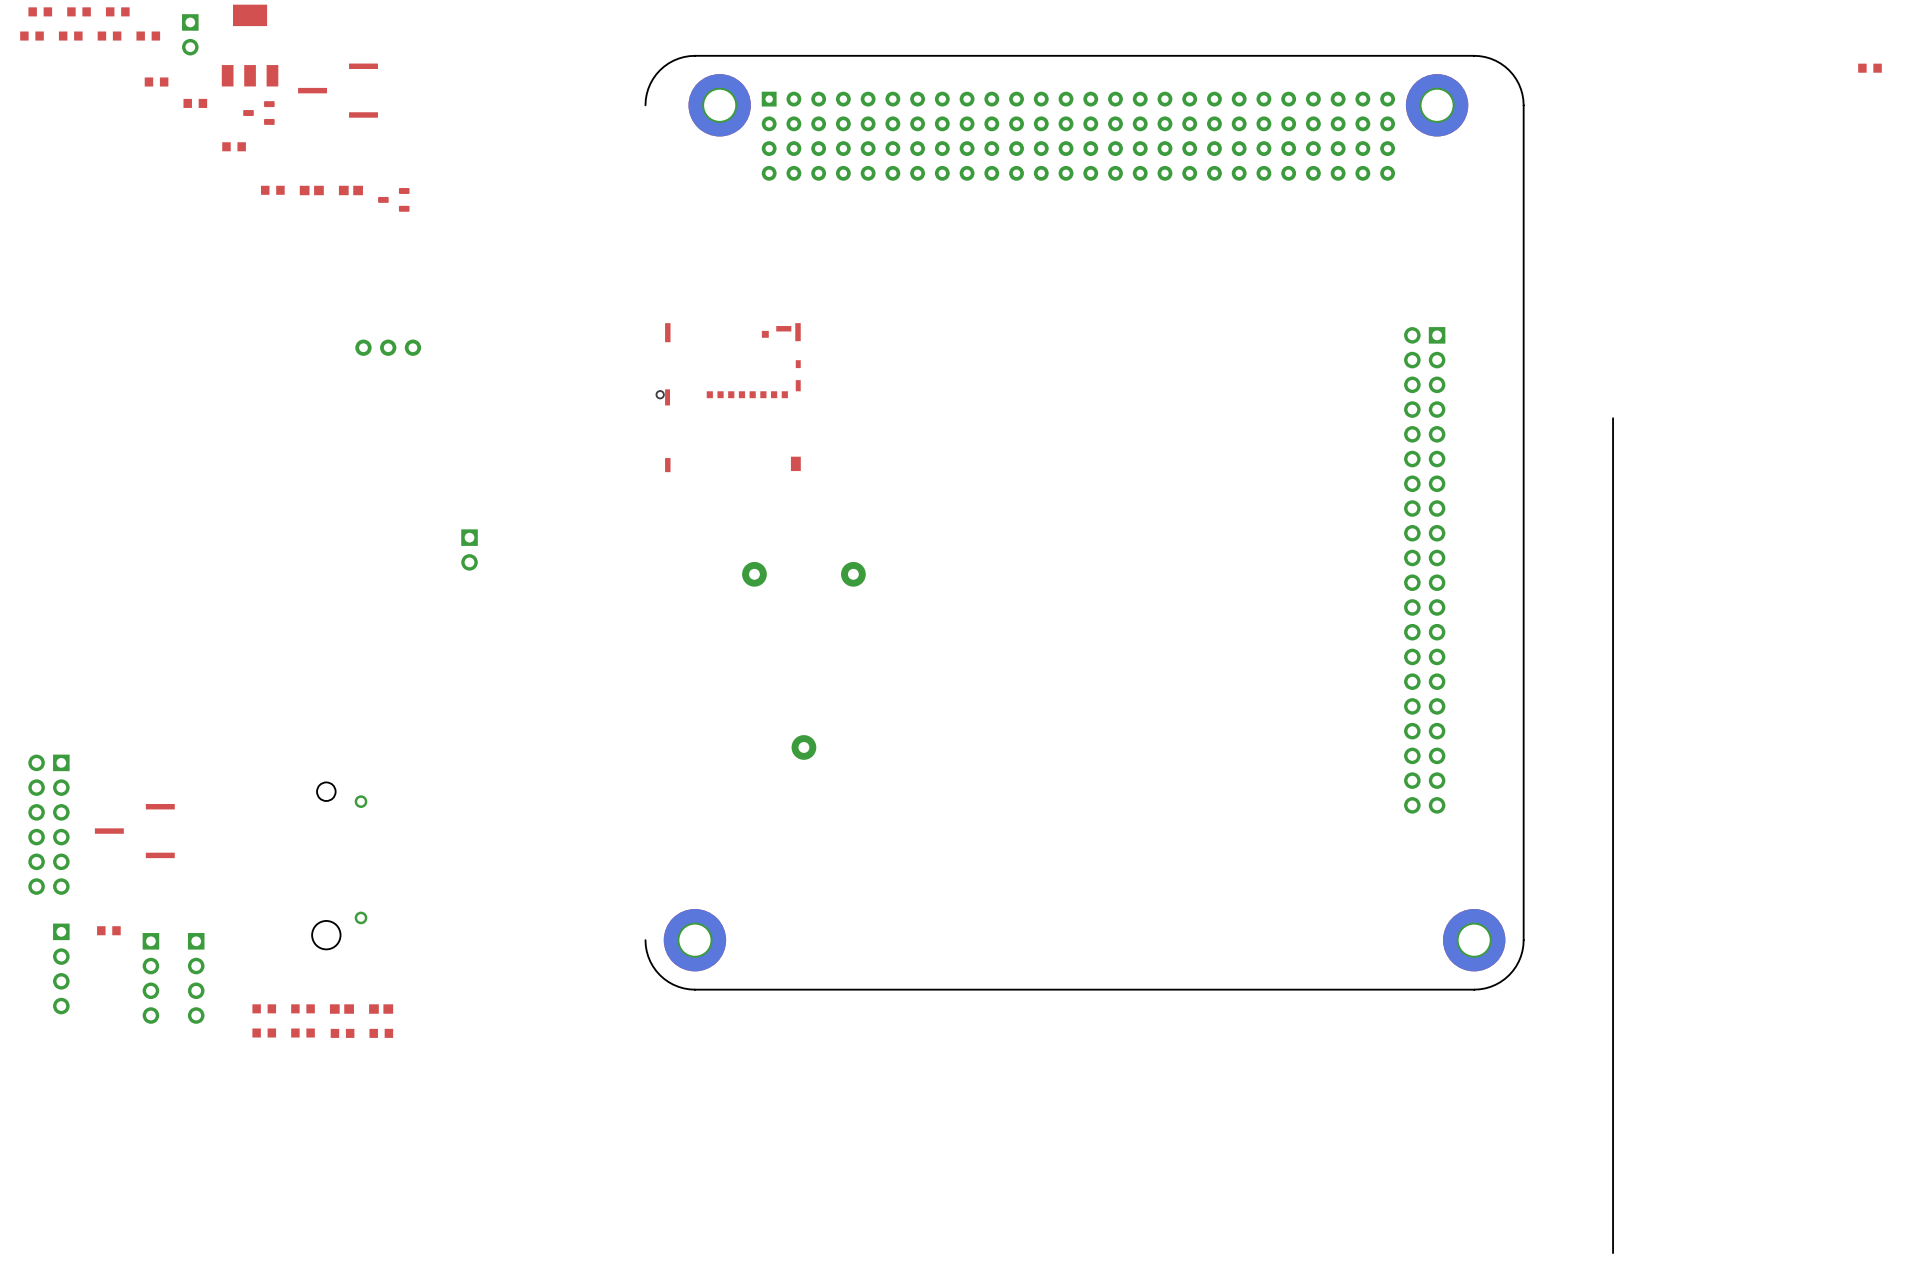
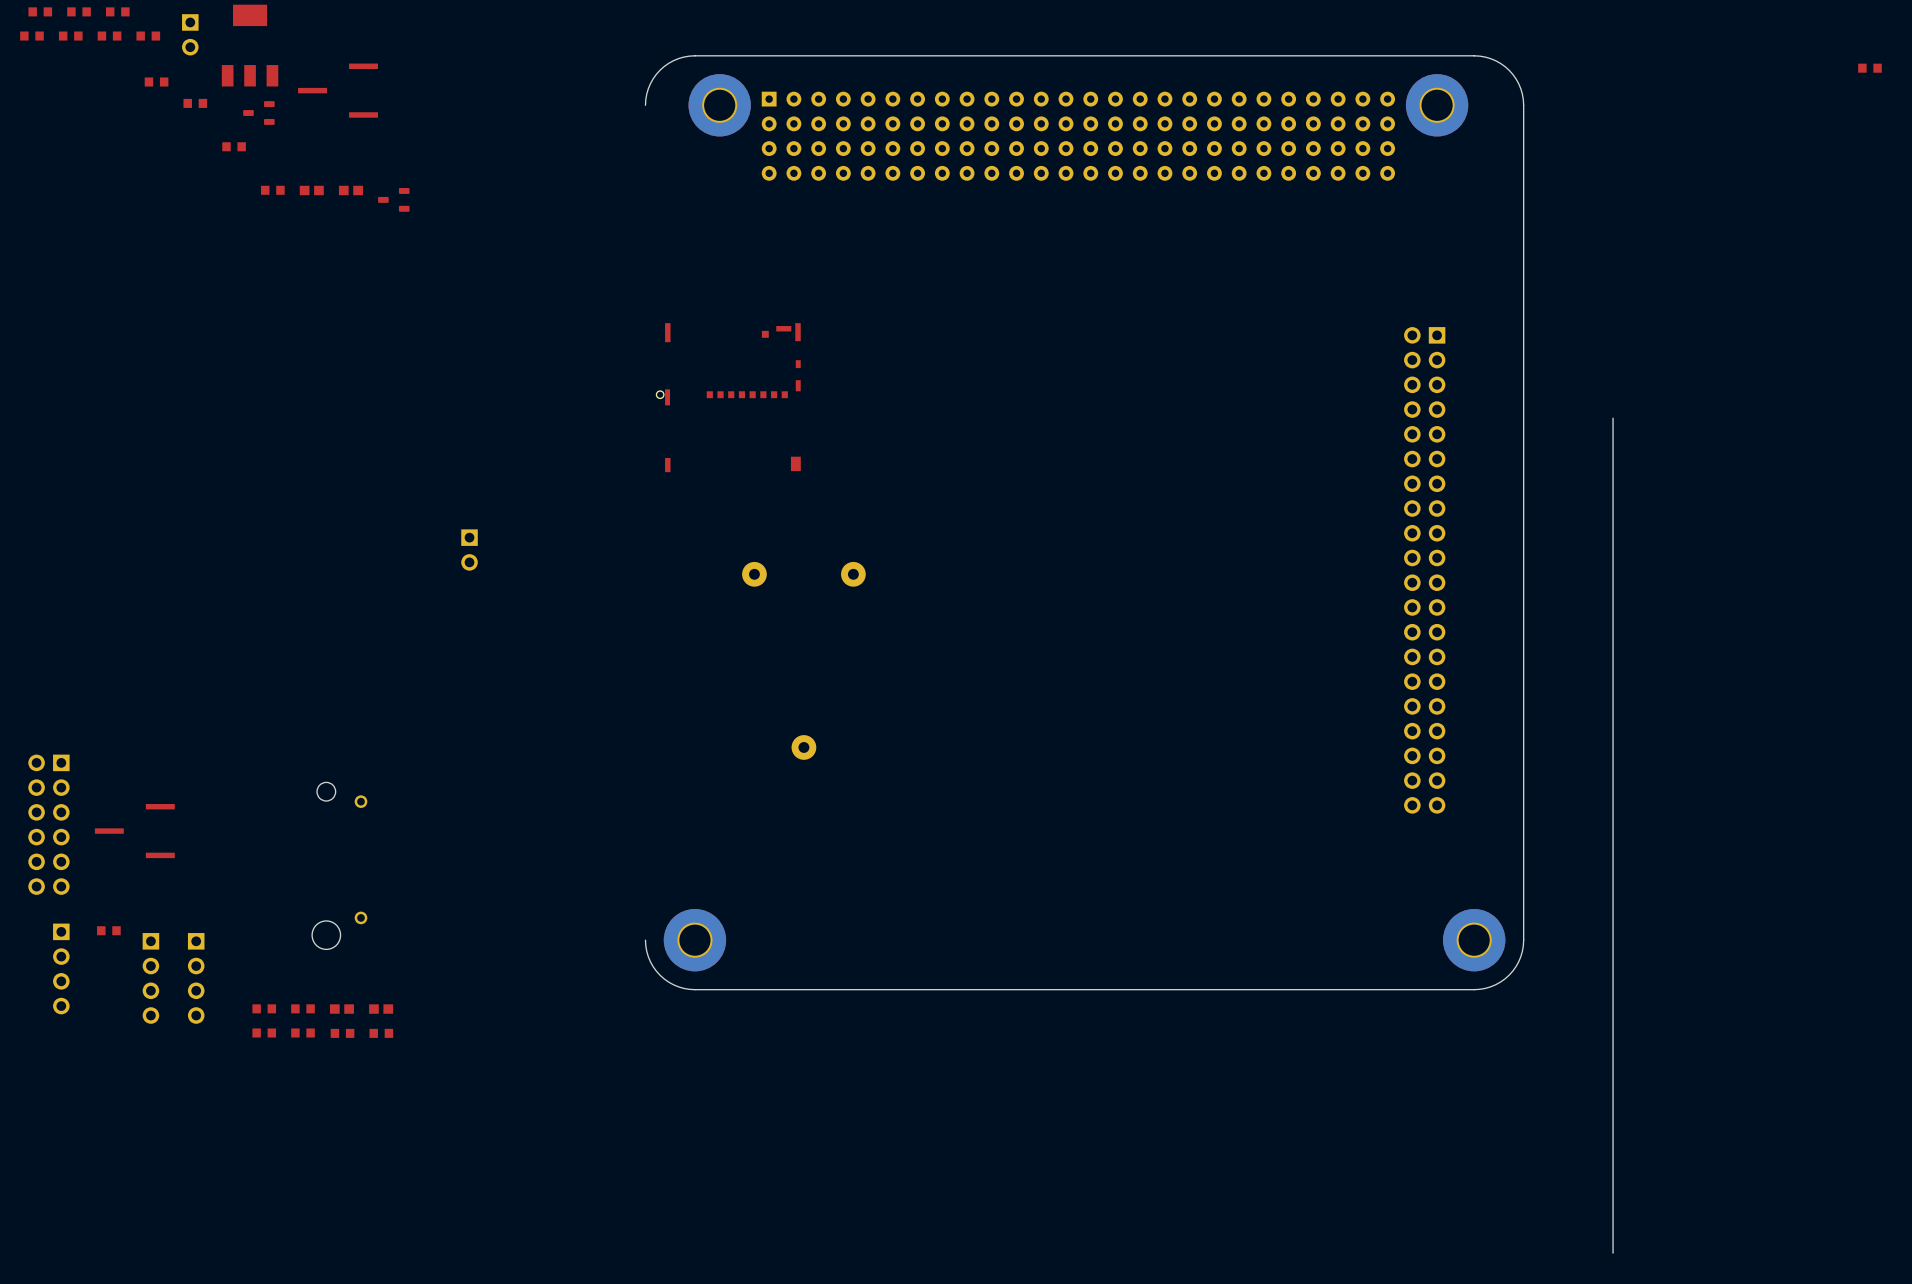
part: (388, 347) -> none

